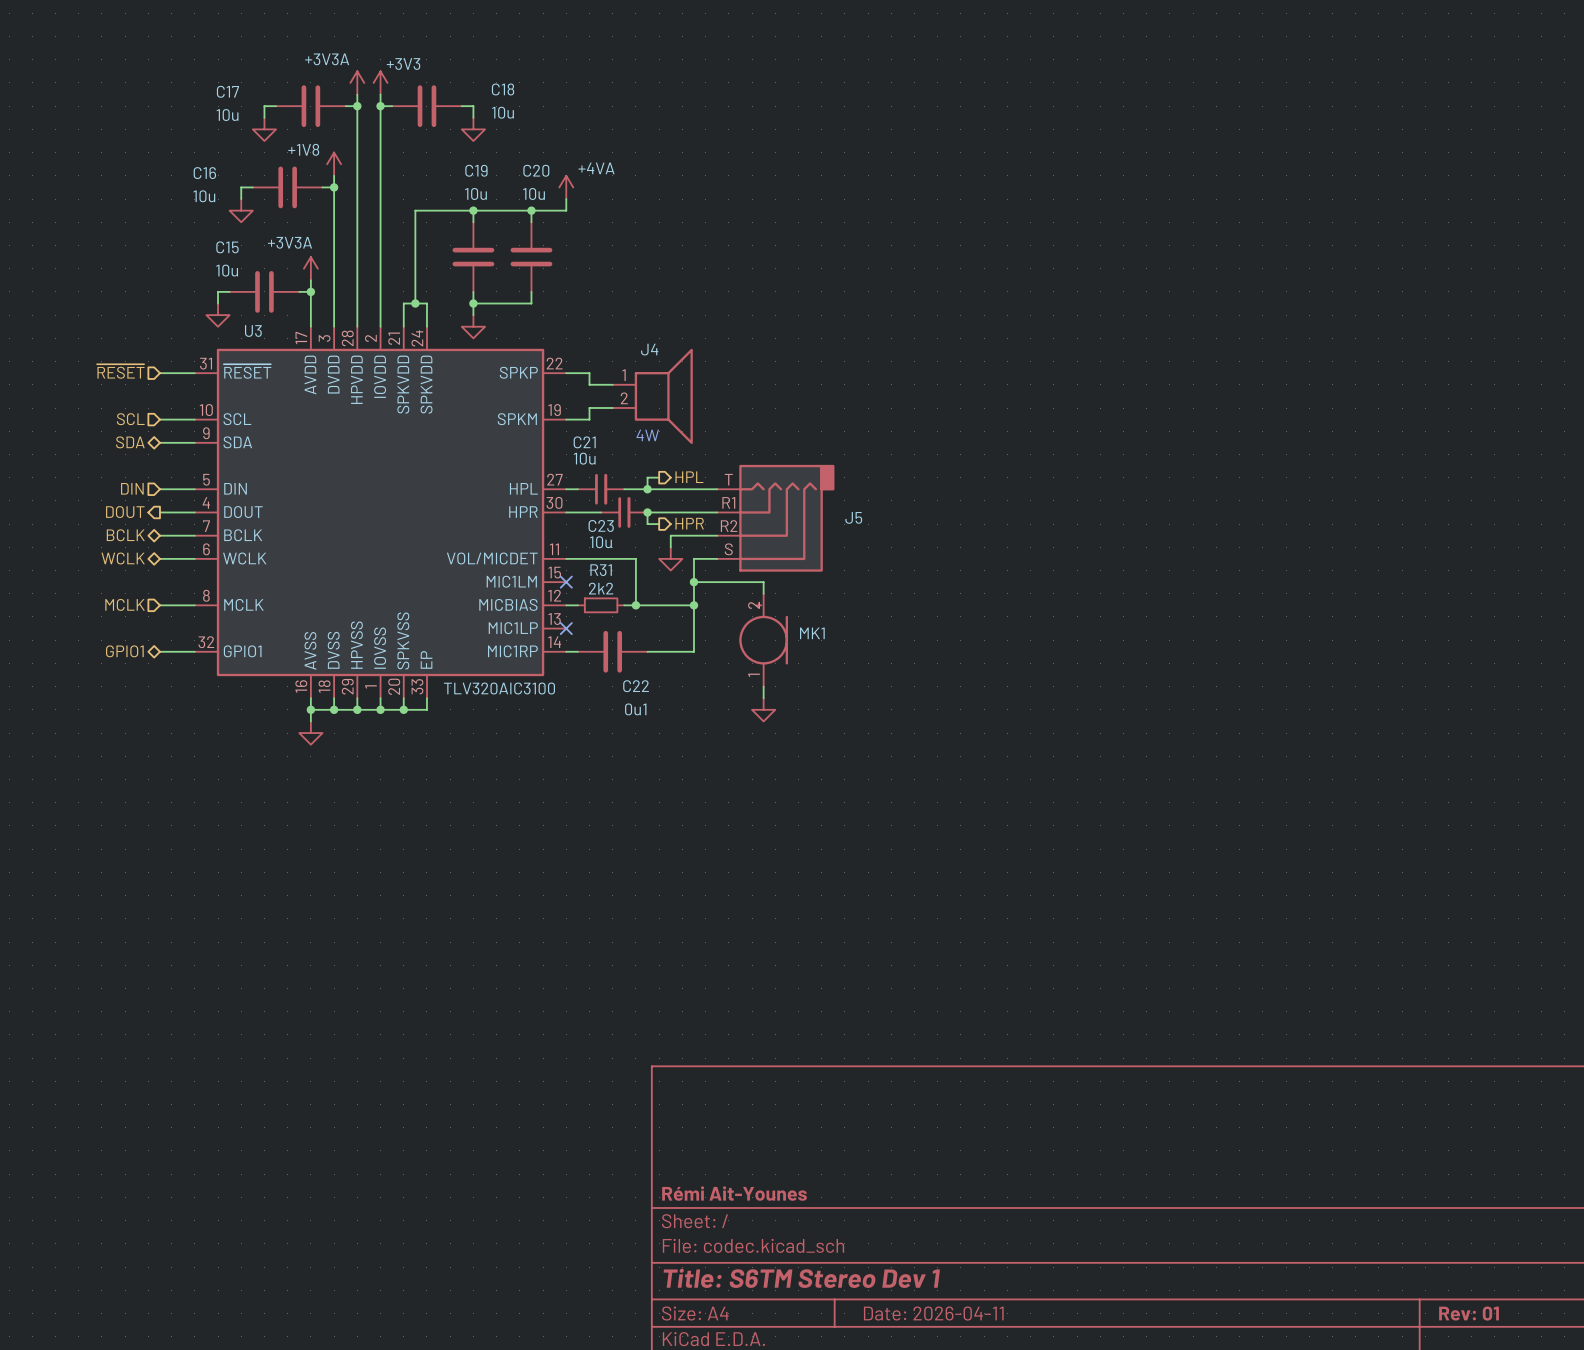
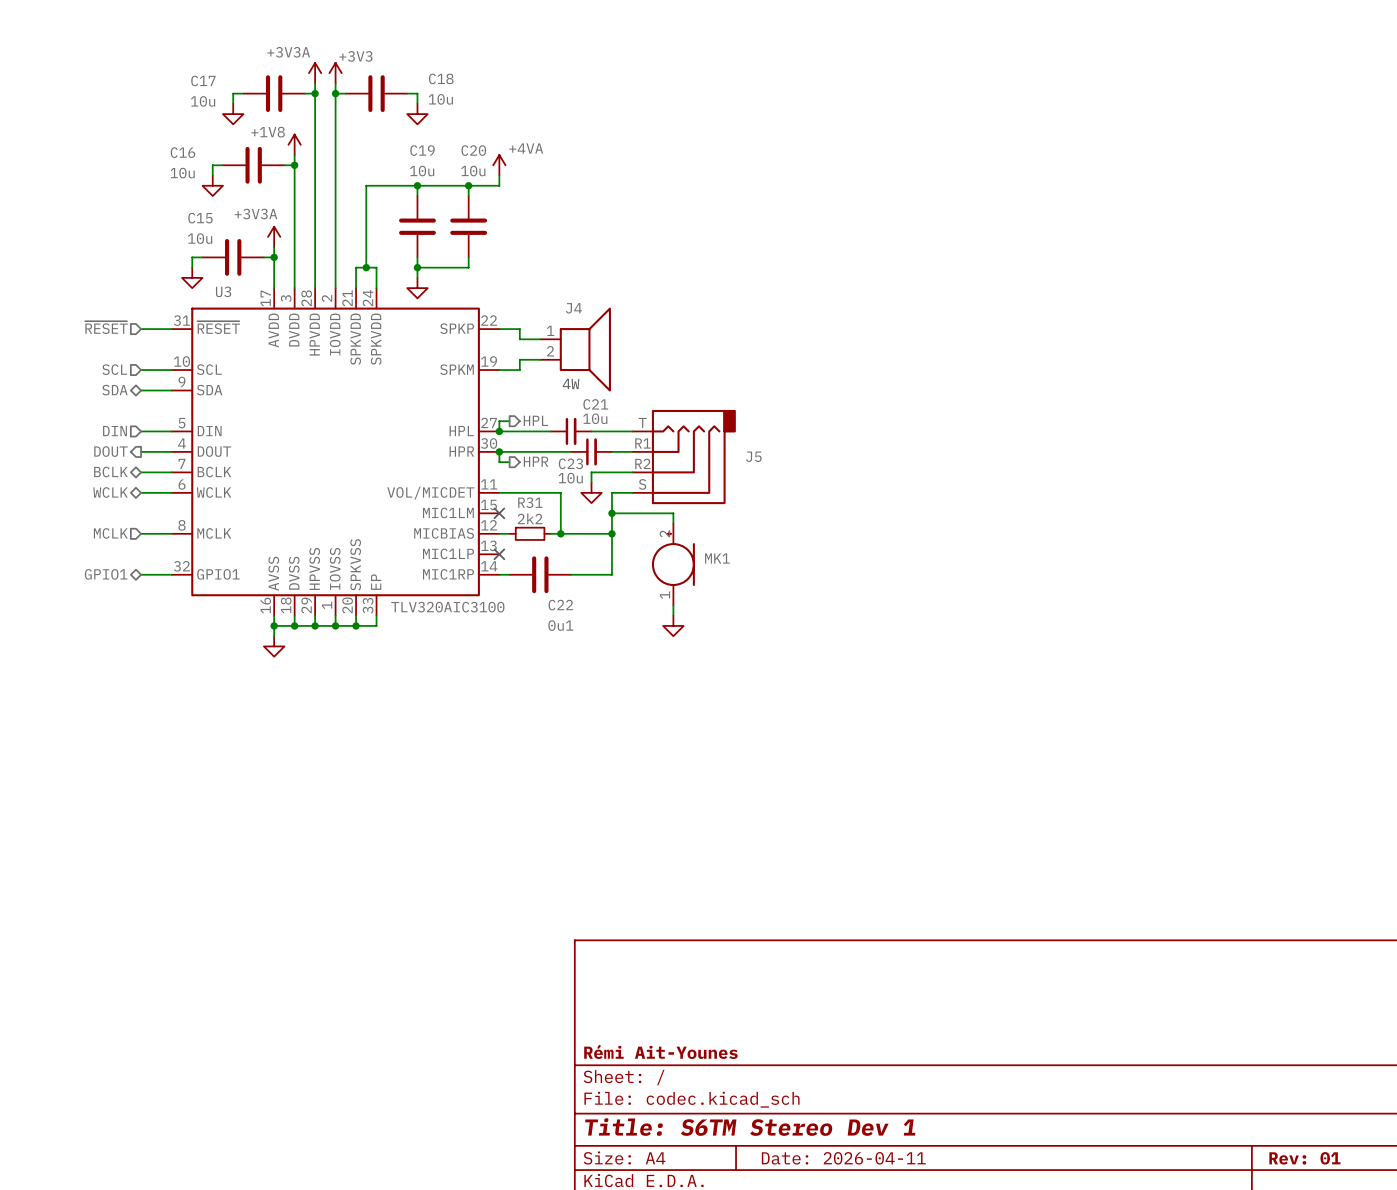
C21 name position: C21 (584, 442) -> C21 (595, 404)
C21 value position: 10u (584, 458) -> 10u (595, 418)
wire: (659, 477) (647, 477) (647, 489) -> (509, 421) (499, 421) (499, 431)
hierarchical label position: HPL (689, 477) -> HPL (535, 420)
junction: none -> (499, 431)
C21 position: (601, 489) -> (571, 431)
junction: (647, 489) -> none
wire: none -> (499, 451) (499, 462) (509, 462)
junction: none -> (499, 451)
C23 position: (624, 512) -> (591, 451)
junction: (647, 512) -> none
hierarchical label position: HPR (689, 523) -> HPR (536, 461)

